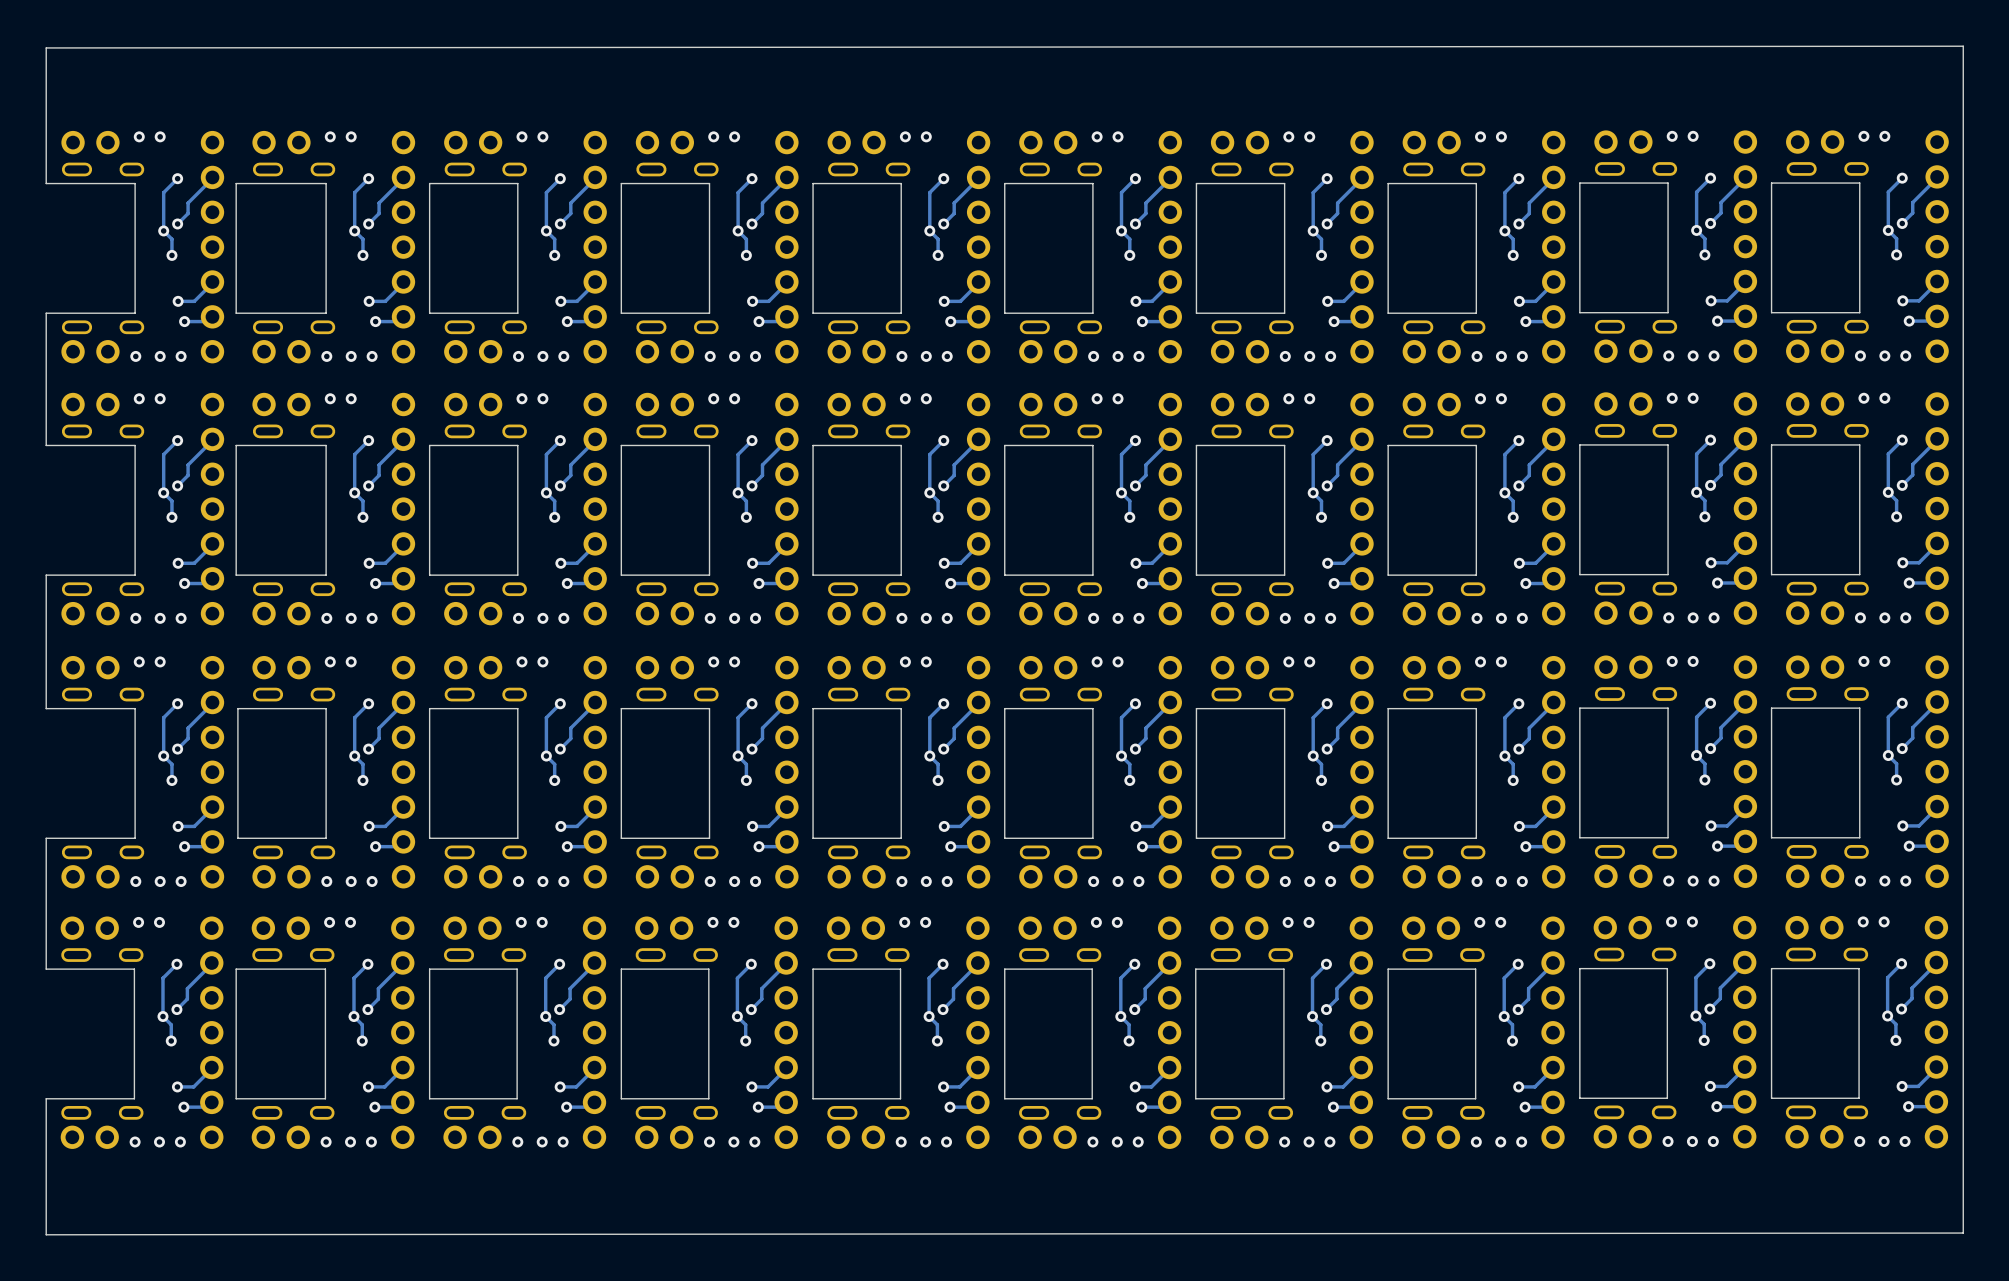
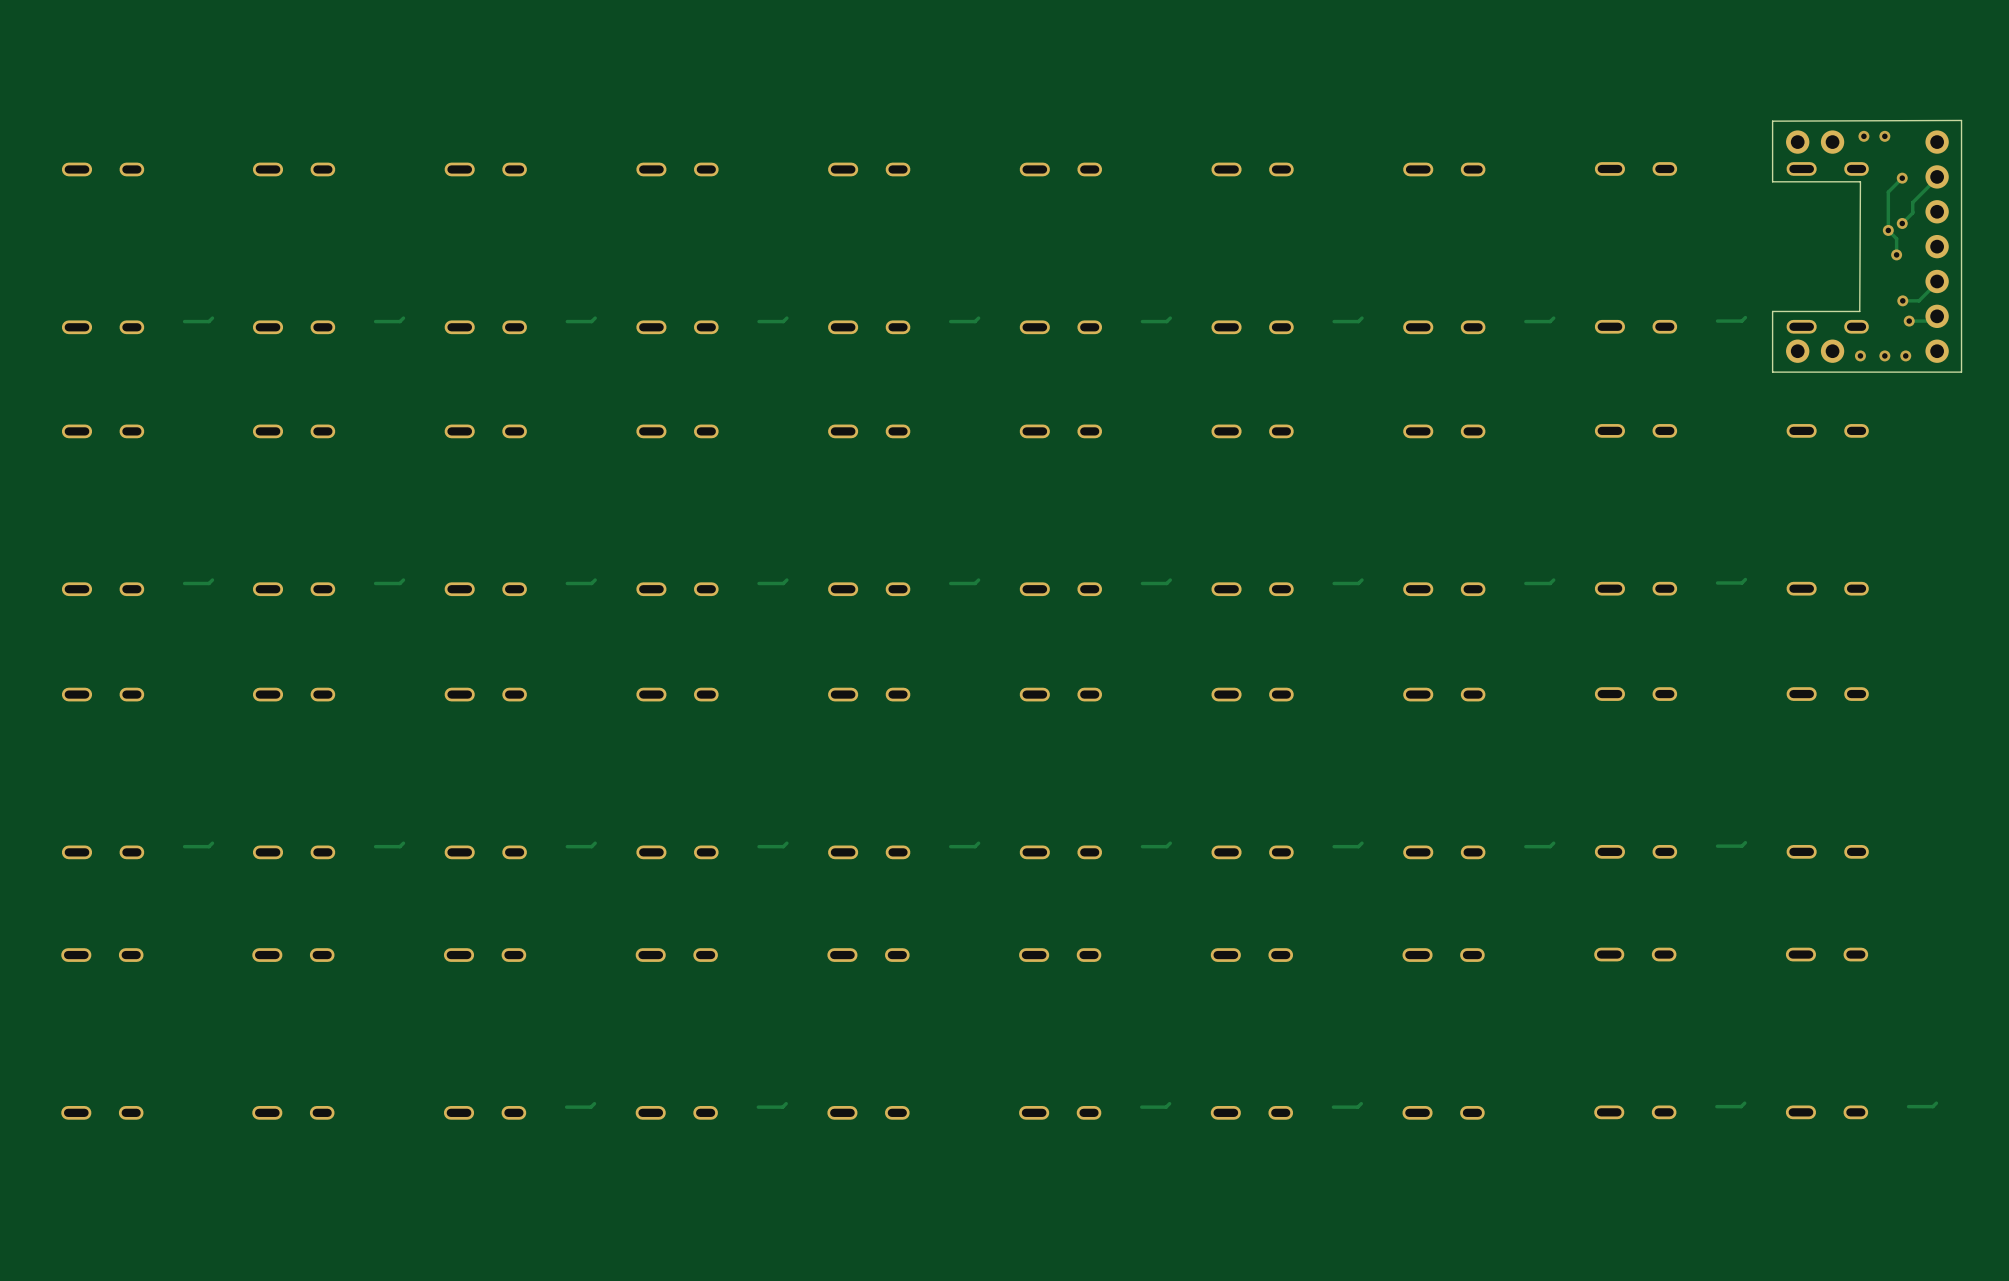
board edge: (1963, 46) (46, 47) (46, 183) (135, 183) (135, 313) (46, 313) (46, 445) (135, 445) (135, 575) (46, 575) (46, 708) (135, 708) (135, 838) (46, 838) (46, 969) (134, 969) (134, 1098) (46, 1098) (46, 1234) (1963, 1233) (1963, 46) -> none
board edge: none -> (1961, 120) (1961, 372) (1772, 372) (1772, 311) (1859, 311) (1860, 181) (1772, 181) (1772, 121) (1961, 120)
via: (139, 136) -> none
via: (160, 136) -> none
via: (330, 136) -> none
via: (351, 136) -> none
via: (521, 136) -> none
via: (542, 136) -> none
via: (713, 136) -> none
via: (734, 136) -> none
via: (905, 136) -> none
via: (926, 136) -> none
via: (1097, 136) -> none
via: (1118, 136) -> none
via: (1288, 136) -> none
via: (1309, 136) -> none
via: (1480, 136) -> none
via: (1501, 136) -> none
via: (1672, 136) -> none
via: (1693, 136) -> none
part: (90, 142) -> none
part: (281, 142) -> none
part: (473, 142) -> none
part: (664, 142) -> none
part: (856, 142) -> none
part: (1048, 142) -> none
part: (1240, 142) -> none
part: (1431, 142) -> none
part: (1623, 142) -> none
track: (177, 178) (163, 192) (163, 230) (171, 239) (171, 255) -> none
via: (177, 178) -> none
track: (212, 178) (188, 203) (188, 213) (177, 223) -> none
track: (368, 178) (354, 192) (354, 230) (362, 239) (362, 255) -> none
via: (368, 178) -> none
track: (403, 178) (379, 203) (379, 213) (368, 223) -> none
track: (560, 178) (546, 192) (546, 230) (554, 239) (554, 255) -> none
via: (560, 178) -> none
track: (595, 178) (570, 203) (570, 213) (560, 223) -> none
track: (752, 178) (738, 192) (738, 230) (746, 239) (746, 255) -> none
via: (752, 178) -> none
track: (786, 178) (762, 203) (762, 213) (752, 223) -> none
track: (943, 178) (929, 192) (929, 230) (938, 239) (938, 255) -> none
via: (943, 178) -> none
track: (978, 178) (954, 203) (954, 213) (943, 223) -> none
track: (1135, 178) (1121, 192) (1121, 230) (1129, 239) (1129, 255) -> none
via: (1135, 178) -> none
track: (1170, 178) (1145, 203) (1145, 213) (1135, 223) -> none
track: (1327, 178) (1313, 192) (1313, 230) (1321, 239) (1321, 255) -> none
via: (1327, 178) -> none
track: (1362, 178) (1337, 203) (1337, 213) (1327, 223) -> none
track: (1518, 178) (1504, 192) (1504, 230) (1513, 239) (1513, 255) -> none
via: (1518, 178) -> none
track: (1553, 178) (1529, 203) (1529, 213) (1518, 223) -> none
track: (1710, 178) (1696, 192) (1696, 230) (1704, 238) (1704, 254) -> none
via: (1710, 178) -> none
track: (1745, 178) (1721, 202) (1721, 213) (1710, 223) -> none
board edge: (326, 183) (326, 313) (236, 313) (236, 183) (326, 183) -> none
board edge: (517, 183) (429, 183) (429, 313) (517, 313) (517, 183) -> none
board edge: (709, 183) (621, 183) (621, 313) (709, 313) (709, 183) -> none
board edge: (901, 183) (813, 183) (813, 313) (901, 313) (901, 183) -> none
board edge: (1092, 183) (1004, 183) (1004, 313) (1092, 313) (1092, 183) -> none
board edge: (1284, 183) (1284, 313) (1196, 313) (1196, 183) (1284, 183) -> none
board edge: (1476, 183) (1476, 313) (1388, 313) (1388, 183) (1476, 183) -> none
board edge: (1668, 183) (1668, 312) (1579, 312) (1579, 183) (1668, 183) -> none
board edge: (1859, 183) (1771, 183) (1771, 312) (1859, 312) (1859, 183) -> none
via: (177, 223) -> none
via: (368, 223) -> none
via: (560, 223) -> none
via: (752, 223) -> none
via: (943, 223) -> none
via: (1135, 223) -> none
via: (1327, 223) -> none
via: (1518, 223) -> none
via: (1710, 223) -> none
via: (163, 230) -> none
via: (354, 230) -> none
via: (546, 230) -> none
via: (738, 230) -> none
via: (929, 230) -> none
via: (1121, 230) -> none
via: (1313, 230) -> none
via: (1504, 230) -> none
via: (1696, 230) -> none
part: (1745, 246) -> none
part: (212, 247) -> none
part: (403, 247) -> none
part: (595, 247) -> none
part: (786, 247) -> none
part: (978, 247) -> none
part: (1170, 247) -> none
part: (1362, 247) -> none
part: (1553, 247) -> none
via: (1704, 254) -> none
via: (171, 255) -> none
via: (362, 255) -> none
via: (554, 255) -> none
via: (746, 255) -> none
via: (938, 255) -> none
via: (1129, 255) -> none
via: (1321, 255) -> none
via: (1513, 255) -> none
track: (1745, 282) (1727, 300) (1711, 300) -> none
track: (212, 283) (194, 301) (178, 301) -> none
track: (403, 283) (385, 301) (369, 301) -> none
track: (595, 283) (577, 301) (560, 301) -> none
track: (786, 283) (768, 301) (752, 301) -> none
track: (978, 283) (960, 301) (944, 301) -> none
track: (1170, 283) (1152, 301) (1135, 301) -> none
track: (1362, 283) (1343, 301) (1327, 301) -> none
track: (1553, 283) (1535, 301) (1519, 301) -> none
via: (1711, 300) -> none
via: (178, 301) -> none
via: (369, 301) -> none
via: (560, 301) -> none
via: (752, 301) -> none
via: (944, 301) -> none
via: (1135, 301) -> none
via: (1327, 301) -> none
via: (1519, 301) -> none
via: (184, 321) -> none
via: (375, 321) -> none
via: (567, 321) -> none
via: (759, 321) -> none
via: (950, 321) -> none
via: (1142, 321) -> none
via: (1334, 321) -> none
via: (1525, 321) -> none
via: (1717, 321) -> none
part: (90, 351) -> none
part: (281, 351) -> none
part: (473, 351) -> none
part: (664, 351) -> none
part: (856, 351) -> none
part: (1048, 351) -> none
part: (1240, 351) -> none
part: (1431, 351) -> none
part: (1623, 351) -> none
via: (1668, 355) -> none
via: (1693, 355) -> none
via: (1714, 355) -> none
via: (135, 356) -> none
via: (160, 356) -> none
via: (181, 356) -> none
via: (326, 356) -> none
via: (351, 356) -> none
via: (372, 356) -> none
via: (518, 356) -> none
via: (542, 356) -> none
via: (563, 356) -> none
via: (710, 356) -> none
via: (734, 356) -> none
via: (755, 356) -> none
via: (901, 356) -> none
via: (926, 356) -> none
via: (947, 356) -> none
via: (1093, 356) -> none
via: (1118, 356) -> none
via: (1138, 356) -> none
via: (1285, 356) -> none
via: (1309, 356) -> none
via: (1330, 356) -> none
via: (1477, 356) -> none
via: (1501, 356) -> none
via: (1522, 356) -> none
via: (139, 398) -> none
via: (160, 398) -> none
via: (330, 398) -> none
via: (351, 398) -> none
via: (521, 398) -> none
via: (542, 398) -> none
via: (713, 398) -> none
via: (734, 398) -> none
via: (905, 398) -> none
via: (926, 398) -> none
via: (1097, 398) -> none
via: (1118, 398) -> none
via: (1288, 398) -> none
via: (1309, 398) -> none
via: (1480, 398) -> none
via: (1501, 398) -> none
via: (1672, 398) -> none
via: (1693, 398) -> none
via: (1863, 398) -> none
via: (1884, 398) -> none
part: (1623, 403) -> none
part: (1815, 403) -> none
part: (90, 404) -> none
part: (281, 404) -> none
part: (473, 404) -> none
part: (664, 404) -> none
part: (856, 404) -> none
part: (1048, 404) -> none
part: (1240, 404) -> none
part: (1431, 404) -> none
track: (177, 440) (163, 454) (163, 492) (171, 501) (171, 517) -> none
via: (177, 440) -> none
track: (212, 440) (188, 464) (188, 475) (177, 485) -> none
track: (368, 440) (354, 454) (354, 492) (362, 501) (362, 517) -> none
via: (368, 440) -> none
track: (403, 440) (379, 464) (379, 475) (368, 485) -> none
track: (560, 440) (546, 454) (546, 492) (554, 501) (554, 517) -> none
via: (560, 440) -> none
track: (595, 440) (570, 464) (570, 475) (560, 485) -> none
track: (752, 440) (738, 454) (738, 492) (746, 501) (746, 517) -> none
via: (752, 440) -> none
track: (786, 440) (762, 464) (762, 475) (752, 485) -> none
track: (943, 440) (929, 454) (929, 492) (938, 501) (938, 517) -> none
via: (943, 440) -> none
track: (978, 440) (954, 464) (954, 475) (943, 485) -> none
track: (1135, 440) (1121, 454) (1121, 492) (1129, 501) (1129, 517) -> none
via: (1135, 440) -> none
track: (1170, 440) (1145, 464) (1145, 475) (1135, 485) -> none
track: (1327, 440) (1313, 454) (1313, 492) (1321, 501) (1321, 517) -> none
via: (1327, 440) -> none
track: (1362, 440) (1337, 464) (1337, 475) (1327, 485) -> none
track: (1518, 440) (1504, 454) (1504, 492) (1513, 501) (1513, 517) -> none
via: (1518, 440) -> none
track: (1553, 440) (1529, 464) (1529, 475) (1518, 485) -> none
track: (1710, 440) (1696, 454) (1696, 492) (1704, 500) (1704, 516) -> none
via: (1710, 440) -> none
track: (1745, 440) (1721, 464) (1721, 474) (1710, 485) -> none
track: (1902, 440) (1888, 454) (1888, 492) (1896, 500) (1896, 516) -> none
via: (1902, 440) -> none
track: (1937, 440) (1912, 464) (1912, 474) (1902, 485) -> none
board edge: (1668, 444) (1668, 574) (1579, 574) (1579, 444) (1668, 444) -> none
board edge: (1859, 444) (1859, 574) (1771, 574) (1771, 444) (1859, 444) -> none
board edge: (326, 445) (236, 445) (236, 575) (326, 575) (326, 445) -> none
board edge: (517, 445) (429, 445) (429, 575) (517, 575) (517, 445) -> none
board edge: (709, 445) (621, 445) (621, 575) (709, 575) (709, 445) -> none
board edge: (901, 445) (813, 445) (813, 575) (901, 575) (901, 445) -> none
board edge: (1092, 445) (1004, 445) (1004, 575) (1092, 575) (1092, 445) -> none
board edge: (1284, 445) (1196, 445) (1196, 575) (1284, 575) (1284, 445) -> none
board edge: (1476, 445) (1388, 445) (1388, 575) (1476, 575) (1476, 445) -> none
via: (177, 485) -> none
via: (368, 485) -> none
via: (560, 485) -> none
via: (752, 485) -> none
via: (943, 485) -> none
via: (1135, 485) -> none
via: (1327, 485) -> none
via: (1518, 485) -> none
via: (1710, 485) -> none
via: (1902, 485) -> none
via: (163, 492) -> none
via: (354, 492) -> none
via: (546, 492) -> none
via: (738, 492) -> none
via: (929, 492) -> none
via: (1121, 492) -> none
via: (1313, 492) -> none
via: (1504, 492) -> none
via: (1696, 492) -> none
via: (1888, 492) -> none
part: (1745, 508) -> none
part: (1937, 508) -> none
part: (212, 509) -> none
part: (403, 509) -> none
part: (595, 509) -> none
part: (786, 509) -> none
part: (978, 509) -> none
part: (1170, 509) -> none
part: (1362, 509) -> none
part: (1553, 509) -> none
via: (1704, 516) -> none
via: (1896, 516) -> none
via: (171, 517) -> none
via: (362, 517) -> none
via: (554, 517) -> none
via: (746, 517) -> none
via: (938, 517) -> none
via: (1129, 517) -> none
via: (1321, 517) -> none
via: (1513, 517) -> none
track: (1745, 544) (1727, 562) (1711, 562) -> none
track: (1937, 544) (1919, 562) (1902, 562) -> none
track: (212, 545) (194, 563) (178, 563) -> none
track: (403, 545) (385, 563) (369, 563) -> none
track: (595, 545) (577, 563) (560, 563) -> none
track: (786, 545) (768, 563) (752, 563) -> none
track: (978, 545) (960, 563) (944, 563) -> none
track: (1170, 545) (1152, 563) (1135, 563) -> none
track: (1362, 545) (1343, 563) (1327, 563) -> none
track: (1553, 545) (1535, 563) (1519, 563) -> none
via: (1711, 562) -> none
via: (1902, 562) -> none
via: (178, 563) -> none
via: (369, 563) -> none
via: (560, 563) -> none
via: (752, 563) -> none
via: (944, 563) -> none
via: (1135, 563) -> none
via: (1327, 563) -> none
via: (1519, 563) -> none
track: (1937, 579) (1933, 582) (1909, 582) -> none
via: (1717, 582) -> none
via: (1909, 582) -> none
via: (184, 583) -> none
via: (375, 583) -> none
via: (567, 583) -> none
via: (759, 583) -> none
via: (950, 583) -> none
via: (1142, 583) -> none
via: (1334, 583) -> none
via: (1525, 583) -> none
part: (90, 613) -> none
part: (281, 613) -> none
part: (473, 613) -> none
part: (664, 613) -> none
part: (856, 613) -> none
part: (1048, 613) -> none
part: (1240, 613) -> none
part: (1431, 613) -> none
part: (1623, 613) -> none
part: (1815, 613) -> none
via: (1668, 617) -> none
via: (1693, 617) -> none
via: (1714, 617) -> none
via: (1860, 617) -> none
via: (1884, 617) -> none
via: (1905, 617) -> none
via: (135, 618) -> none
via: (160, 618) -> none
via: (181, 618) -> none
via: (326, 618) -> none
via: (351, 618) -> none
via: (372, 618) -> none
via: (518, 618) -> none
via: (542, 618) -> none
via: (563, 618) -> none
via: (710, 618) -> none
via: (734, 618) -> none
via: (755, 618) -> none
via: (901, 618) -> none
via: (926, 618) -> none
via: (947, 618) -> none
via: (1093, 618) -> none
via: (1118, 618) -> none
via: (1138, 618) -> none
via: (1285, 618) -> none
via: (1309, 618) -> none
via: (1330, 618) -> none
via: (1477, 618) -> none
via: (1501, 618) -> none
via: (1522, 618) -> none
via: (139, 661) -> none
via: (160, 661) -> none
via: (330, 661) -> none
via: (351, 661) -> none
via: (521, 661) -> none
via: (542, 661) -> none
via: (713, 661) -> none
via: (734, 661) -> none
via: (905, 661) -> none
via: (926, 661) -> none
via: (1097, 661) -> none
via: (1118, 661) -> none
via: (1288, 661) -> none
via: (1309, 661) -> none
via: (1480, 661) -> none
via: (1501, 661) -> none
via: (1672, 661) -> none
via: (1693, 661) -> none
via: (1863, 661) -> none
via: (1884, 661) -> none
part: (90, 667) -> none
part: (281, 667) -> none
part: (473, 667) -> none
part: (664, 667) -> none
part: (856, 667) -> none
part: (1048, 667) -> none
part: (1240, 667) -> none
part: (1431, 667) -> none
part: (1623, 667) -> none
part: (1815, 667) -> none
track: (177, 703) (163, 717) (163, 756) (171, 764) (171, 780) -> none
via: (177, 703) -> none
track: (212, 703) (188, 728) (188, 738) (177, 749) -> none
track: (368, 703) (354, 717) (354, 756) (362, 764) (362, 780) -> none
via: (368, 703) -> none
track: (403, 703) (379, 728) (379, 738) (368, 749) -> none
track: (560, 703) (546, 717) (546, 756) (554, 764) (554, 780) -> none
via: (560, 703) -> none
track: (595, 703) (570, 728) (570, 738) (560, 749) -> none
track: (752, 703) (738, 717) (738, 756) (746, 764) (746, 780) -> none
via: (752, 703) -> none
track: (786, 703) (762, 728) (762, 738) (752, 749) -> none
track: (943, 703) (929, 717) (929, 756) (938, 764) (938, 780) -> none
via: (943, 703) -> none
track: (978, 703) (954, 728) (954, 738) (943, 749) -> none
track: (1135, 703) (1121, 717) (1121, 756) (1129, 764) (1129, 780) -> none
via: (1135, 703) -> none
track: (1170, 703) (1145, 728) (1145, 738) (1135, 749) -> none
track: (1327, 703) (1313, 717) (1313, 756) (1321, 764) (1321, 780) -> none
via: (1327, 703) -> none
track: (1362, 703) (1337, 728) (1337, 738) (1327, 749) -> none
track: (1518, 703) (1504, 717) (1504, 756) (1513, 764) (1513, 780) -> none
via: (1518, 703) -> none
track: (1553, 703) (1529, 728) (1529, 738) (1518, 749) -> none
track: (1710, 703) (1696, 717) (1696, 755) (1704, 763) (1704, 779) -> none
via: (1710, 703) -> none
track: (1745, 703) (1721, 727) (1721, 738) (1710, 748) -> none
track: (1902, 703) (1888, 717) (1888, 755) (1896, 763) (1896, 779) -> none
via: (1902, 703) -> none
track: (1937, 703) (1912, 727) (1912, 738) (1902, 748) -> none
board edge: (326, 708) (326, 838) (237, 838) (237, 708) (326, 708) -> none
board edge: (517, 708) (429, 708) (429, 838) (517, 838) (517, 708) -> none
board edge: (709, 708) (621, 708) (621, 838) (709, 838) (709, 708) -> none
board edge: (901, 708) (813, 708) (813, 838) (901, 838) (901, 708) -> none
board edge: (1092, 708) (1004, 708) (1004, 838) (1092, 838) (1092, 708) -> none
board edge: (1284, 708) (1196, 708) (1196, 838) (1284, 838) (1284, 708) -> none
board edge: (1476, 708) (1388, 708) (1388, 838) (1476, 838) (1476, 708) -> none
board edge: (1668, 708) (1579, 708) (1579, 837) (1668, 837) (1668, 708) -> none
board edge: (1859, 708) (1771, 708) (1771, 837) (1859, 837) (1859, 708) -> none
via: (1710, 748) -> none
via: (1902, 748) -> none
via: (177, 749) -> none
via: (368, 749) -> none
via: (560, 749) -> none
via: (752, 749) -> none
via: (943, 749) -> none
via: (1135, 749) -> none
via: (1327, 749) -> none
via: (1518, 749) -> none
via: (1696, 755) -> none
via: (1888, 755) -> none
via: (163, 756) -> none
via: (354, 756) -> none
via: (546, 756) -> none
via: (738, 756) -> none
via: (929, 756) -> none
via: (1121, 756) -> none
via: (1313, 756) -> none
via: (1504, 756) -> none
part: (1745, 771) -> none
part: (1937, 771) -> none
part: (212, 772) -> none
part: (403, 772) -> none
part: (595, 772) -> none
part: (786, 772) -> none
part: (978, 772) -> none
part: (1170, 772) -> none
part: (1362, 772) -> none
part: (1553, 772) -> none
via: (1704, 779) -> none
via: (1896, 779) -> none
via: (171, 780) -> none
via: (362, 780) -> none
via: (554, 780) -> none
via: (746, 780) -> none
via: (938, 780) -> none
via: (1129, 780) -> none
via: (1321, 780) -> none
via: (1513, 780) -> none
track: (1745, 807) (1727, 825) (1711, 825) -> none
track: (1937, 807) (1919, 825) (1902, 825) -> none
track: (212, 808) (194, 826) (178, 826) -> none
track: (403, 808) (385, 826) (369, 826) -> none
track: (595, 808) (577, 826) (560, 826) -> none
track: (786, 808) (768, 826) (752, 826) -> none
track: (978, 808) (960, 826) (944, 826) -> none
track: (1170, 808) (1152, 826) (1135, 826) -> none
track: (1362, 808) (1343, 826) (1327, 826) -> none
track: (1553, 808) (1535, 826) (1519, 826) -> none
via: (1711, 825) -> none
via: (1902, 825) -> none
via: (178, 826) -> none
via: (369, 826) -> none
via: (560, 826) -> none
via: (752, 826) -> none
via: (944, 826) -> none
via: (1135, 826) -> none
via: (1327, 826) -> none
via: (1519, 826) -> none
track: (1937, 842) (1933, 846) (1909, 846) -> none
via: (184, 846) -> none
via: (375, 846) -> none
via: (567, 846) -> none
via: (759, 846) -> none
via: (950, 846) -> none
via: (1142, 846) -> none
via: (1334, 846) -> none
via: (1525, 846) -> none
via: (1717, 846) -> none
via: (1909, 846) -> none
part: (90, 876) -> none
part: (281, 876) -> none
part: (473, 876) -> none
part: (664, 876) -> none
part: (856, 876) -> none
part: (1048, 876) -> none
part: (1240, 876) -> none
part: (1431, 876) -> none
part: (1623, 876) -> none
part: (1815, 876) -> none
via: (135, 881) -> none
via: (160, 881) -> none
via: (181, 881) -> none
via: (326, 881) -> none
via: (351, 881) -> none
via: (372, 881) -> none
via: (518, 881) -> none
via: (542, 881) -> none
via: (563, 881) -> none
via: (710, 881) -> none
via: (734, 881) -> none
via: (755, 881) -> none
via: (901, 881) -> none
via: (926, 881) -> none
via: (947, 881) -> none
via: (1093, 881) -> none
via: (1118, 881) -> none
via: (1138, 881) -> none
via: (1285, 881) -> none
via: (1309, 881) -> none
via: (1330, 881) -> none
via: (1477, 881) -> none
via: (1501, 881) -> none
via: (1522, 881) -> none
via: (1668, 881) -> none
via: (1693, 881) -> none
via: (1714, 881) -> none
via: (1860, 881) -> none
via: (1884, 881) -> none
via: (1905, 881) -> none
via: (1671, 921) -> none
via: (1692, 921) -> none
via: (1863, 921) -> none
via: (1884, 921) -> none
via: (138, 922) -> none
via: (159, 922) -> none
via: (329, 922) -> none
via: (350, 922) -> none
via: (521, 922) -> none
via: (542, 922) -> none
via: (713, 922) -> none
via: (733, 922) -> none
via: (904, 922) -> none
via: (925, 922) -> none
via: (1096, 922) -> none
via: (1117, 922) -> none
via: (1288, 922) -> none
via: (1309, 922) -> none
via: (1479, 922) -> none
via: (1500, 922) -> none
part: (1622, 927) -> none
part: (1814, 927) -> none
part: (89, 928) -> none
part: (280, 928) -> none
part: (472, 928) -> none
part: (664, 928) -> none
part: (855, 928) -> none
part: (1047, 928) -> none
part: (1239, 928) -> none
part: (1431, 928) -> none
track: (1709, 963) (1695, 977) (1695, 1016) (1704, 1024) (1704, 1040) -> none
via: (1709, 963) -> none
track: (1744, 963) (1720, 988) (1720, 998) (1709, 1009) -> none
track: (1901, 963) (1887, 977) (1887, 1016) (1895, 1024) (1895, 1040) -> none
via: (1901, 963) -> none
track: (1936, 963) (1912, 988) (1912, 998) (1901, 1009) -> none
track: (176, 964) (162, 978) (162, 1016) (171, 1024) (171, 1040) -> none
via: (176, 964) -> none
track: (211, 964) (187, 988) (187, 999) (176, 1009) -> none
track: (367, 964) (353, 978) (353, 1016) (362, 1024) (362, 1040) -> none
via: (367, 964) -> none
track: (402, 964) (378, 988) (378, 999) (367, 1009) -> none
track: (559, 964) (545, 978) (545, 1016) (553, 1024) (553, 1040) -> none
via: (559, 964) -> none
track: (594, 964) (570, 988) (570, 999) (559, 1009) -> none
track: (751, 964) (737, 978) (737, 1016) (745, 1024) (745, 1040) -> none
via: (751, 964) -> none
track: (786, 964) (761, 988) (761, 999) (751, 1009) -> none
track: (943, 964) (929, 978) (929, 1016) (937, 1024) (937, 1040) -> none
via: (943, 964) -> none
track: (977, 964) (953, 988) (953, 999) (943, 1009) -> none
track: (1134, 964) (1120, 978) (1120, 1016) (1129, 1024) (1129, 1040) -> none
via: (1134, 964) -> none
track: (1169, 964) (1145, 988) (1145, 999) (1134, 1009) -> none
track: (1326, 964) (1312, 978) (1312, 1016) (1320, 1024) (1320, 1040) -> none
via: (1326, 964) -> none
track: (1361, 964) (1336, 988) (1336, 999) (1326, 1009) -> none
track: (1518, 964) (1504, 978) (1504, 1016) (1512, 1024) (1512, 1040) -> none
via: (1518, 964) -> none
track: (1553, 964) (1528, 988) (1528, 999) (1518, 1009) -> none
board edge: (1667, 968) (1579, 968) (1579, 1098) (1667, 1098) (1667, 968) -> none
board edge: (1859, 968) (1771, 968) (1771, 1098) (1859, 1098) (1859, 968) -> none
board edge: (325, 969) (236, 969) (236, 1098) (325, 1098) (325, 969) -> none
board edge: (517, 969) (429, 969) (429, 1098) (517, 1098) (517, 969) -> none
board edge: (708, 969) (621, 969) (621, 1098) (708, 1098) (708, 969) -> none
board edge: (900, 969) (813, 969) (813, 1098) (900, 1098) (900, 969) -> none
board edge: (1092, 969) (1004, 969) (1004, 1098) (1092, 1098) (1092, 969) -> none
board edge: (1283, 969) (1195, 969) (1195, 1098) (1283, 1098) (1283, 969) -> none
board edge: (1475, 969) (1388, 969) (1388, 1098) (1475, 1098) (1475, 969) -> none
via: (176, 1009) -> none
via: (367, 1009) -> none
via: (559, 1009) -> none
via: (751, 1009) -> none
via: (943, 1009) -> none
via: (1134, 1009) -> none
via: (1326, 1009) -> none
via: (1518, 1009) -> none
via: (1709, 1009) -> none
via: (1901, 1009) -> none
via: (162, 1016) -> none
via: (353, 1016) -> none
via: (545, 1016) -> none
via: (737, 1016) -> none
via: (929, 1016) -> none
via: (1120, 1016) -> none
via: (1312, 1016) -> none
via: (1504, 1016) -> none
via: (1695, 1016) -> none
via: (1887, 1016) -> none
part: (211, 1032) -> none
part: (402, 1032) -> none
part: (594, 1032) -> none
part: (786, 1032) -> none
part: (977, 1032) -> none
part: (1169, 1032) -> none
part: (1361, 1032) -> none
part: (1553, 1032) -> none
part: (1744, 1032) -> none
part: (1936, 1032) -> none
via: (171, 1040) -> none
via: (362, 1040) -> none
via: (553, 1040) -> none
via: (745, 1040) -> none
via: (937, 1040) -> none
via: (1129, 1040) -> none
via: (1320, 1040) -> none
via: (1512, 1040) -> none
via: (1704, 1040) -> none
via: (1895, 1040) -> none
track: (211, 1068) (193, 1086) (177, 1086) -> none
track: (402, 1068) (384, 1086) (368, 1086) -> none
track: (594, 1068) (576, 1086) (560, 1086) -> none
track: (786, 1068) (768, 1086) (751, 1086) -> none
track: (977, 1068) (959, 1086) (943, 1086) -> none
track: (1169, 1068) (1151, 1086) (1135, 1086) -> none
track: (1361, 1068) (1343, 1086) (1326, 1086) -> none
track: (1553, 1068) (1534, 1086) (1518, 1086) -> none
track: (1744, 1068) (1726, 1086) (1710, 1086) -> none
track: (1936, 1068) (1918, 1086) (1902, 1086) -> none
via: (177, 1086) -> none
via: (368, 1086) -> none
via: (560, 1086) -> none
via: (751, 1086) -> none
via: (943, 1086) -> none
via: (1135, 1086) -> none
via: (1326, 1086) -> none
via: (1518, 1086) -> none
via: (1710, 1086) -> none
via: (1902, 1086) -> none
track: (211, 1103) (208, 1107) (183, 1107) -> none
track: (402, 1103) (399, 1107) (374, 1107) -> none
track: (977, 1103) (974, 1107) (950, 1107) -> none
track: (1553, 1103) (1549, 1107) (1525, 1107) -> none
via: (1716, 1106) -> none
via: (1908, 1106) -> none
via: (183, 1107) -> none
via: (374, 1107) -> none
via: (566, 1107) -> none
via: (758, 1107) -> none
via: (950, 1107) -> none
via: (1141, 1107) -> none
via: (1333, 1107) -> none
via: (1525, 1107) -> none
part: (1622, 1136) -> none
part: (1814, 1136) -> none
part: (89, 1137) -> none
part: (280, 1137) -> none
part: (472, 1137) -> none
part: (664, 1137) -> none
part: (855, 1137) -> none
part: (1047, 1137) -> none
part: (1239, 1137) -> none
part: (1431, 1137) -> none
via: (1668, 1141) -> none
via: (1692, 1141) -> none
via: (1713, 1141) -> none
via: (1859, 1141) -> none
via: (1884, 1141) -> none
via: (1905, 1141) -> none
via: (135, 1142) -> none
via: (159, 1142) -> none
via: (180, 1142) -> none
via: (326, 1142) -> none
via: (350, 1142) -> none
via: (371, 1142) -> none
via: (517, 1142) -> none
via: (542, 1142) -> none
via: (563, 1142) -> none
via: (709, 1142) -> none
via: (733, 1142) -> none
via: (754, 1142) -> none
via: (901, 1142) -> none
via: (925, 1142) -> none
via: (946, 1142) -> none
via: (1092, 1142) -> none
via: (1117, 1142) -> none
via: (1138, 1142) -> none
via: (1284, 1142) -> none
via: (1309, 1142) -> none
via: (1329, 1142) -> none
via: (1476, 1142) -> none
via: (1500, 1142) -> none
via: (1521, 1142) -> none

